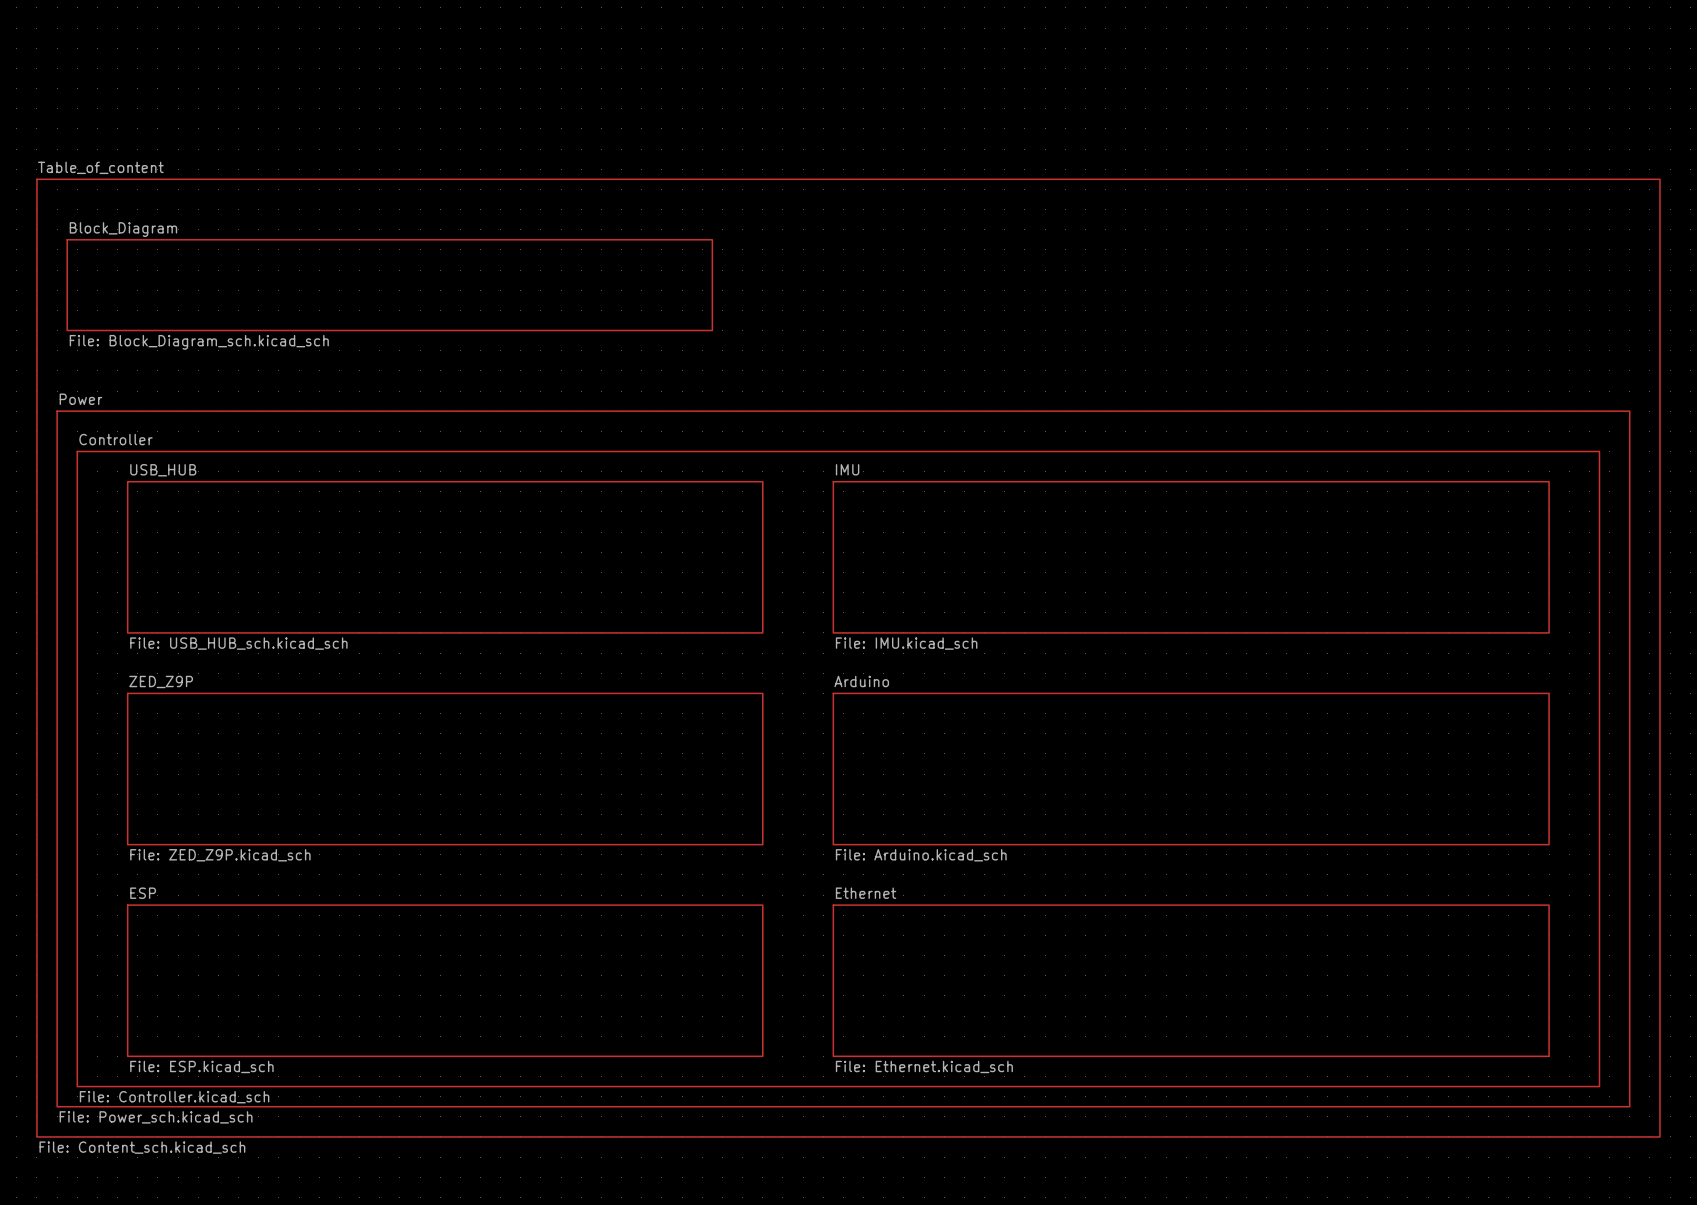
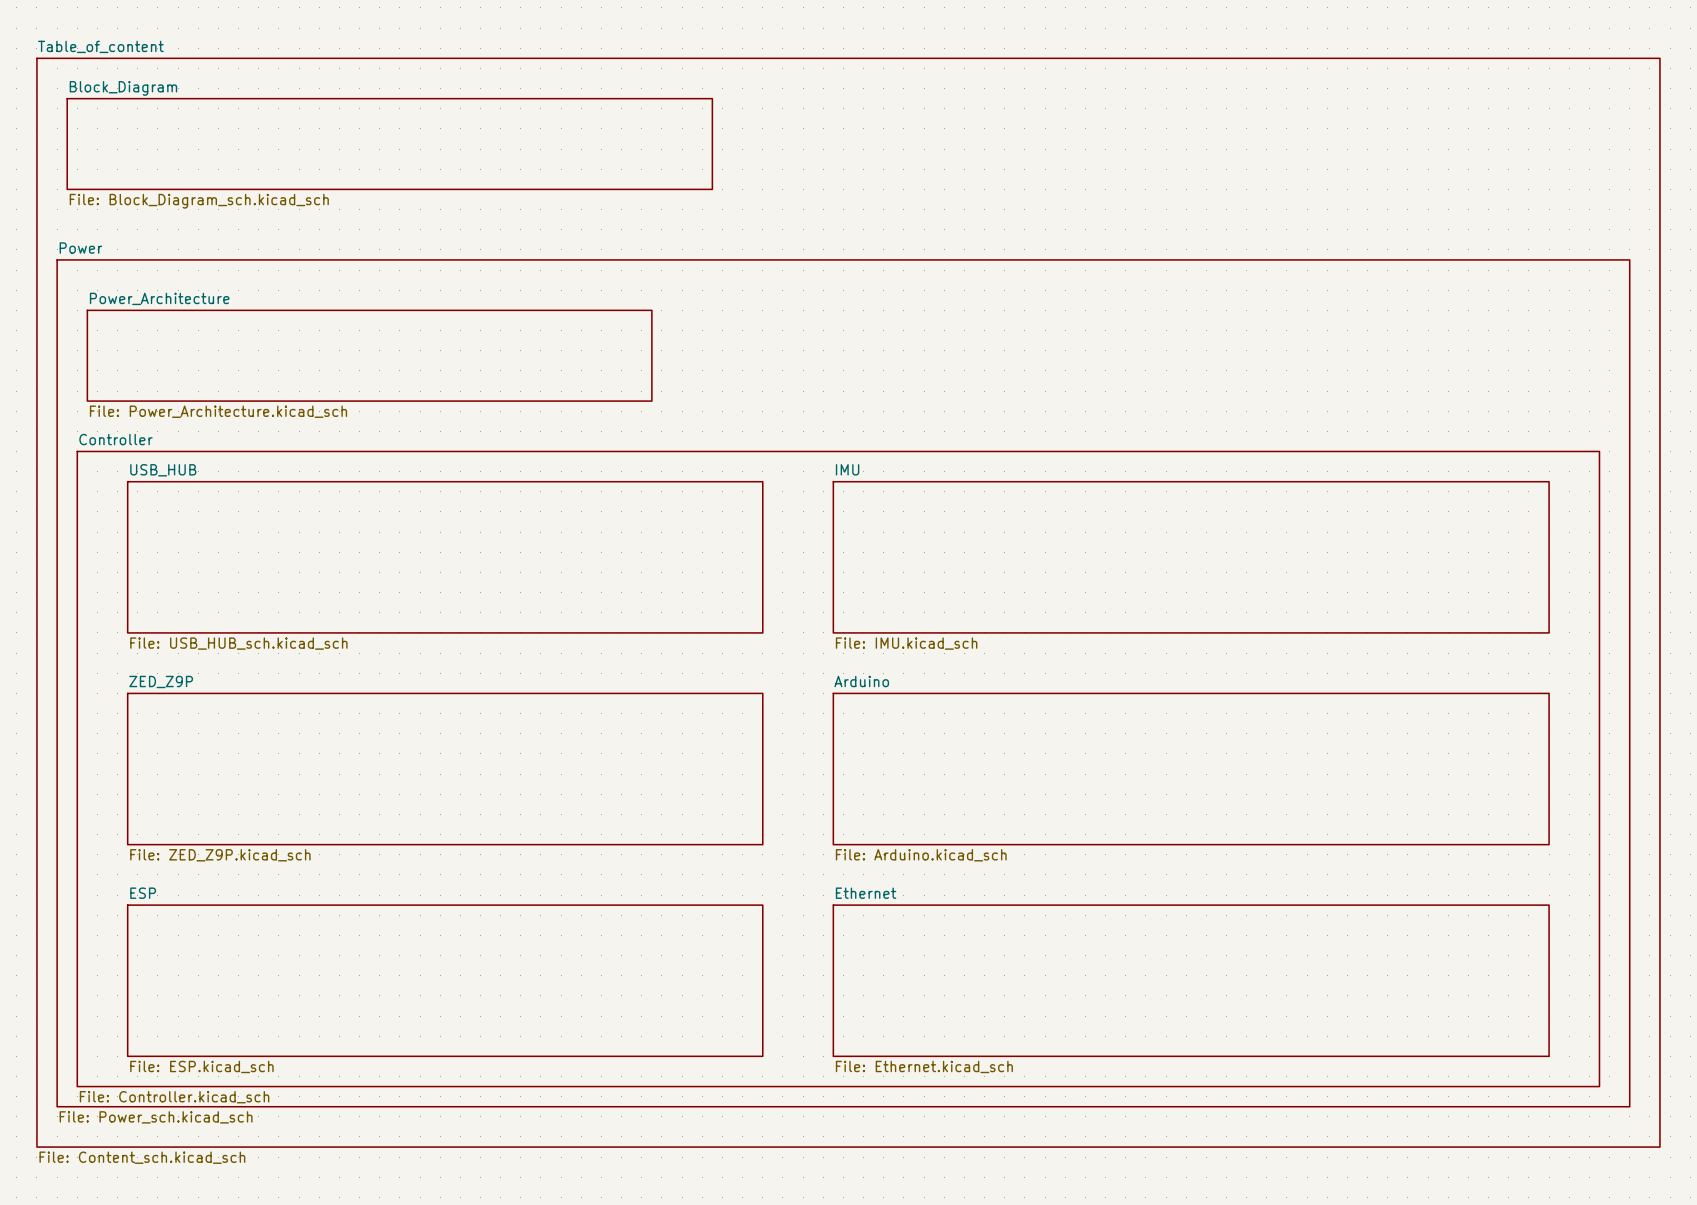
sheet Block_Diagram position: (389, 285) -> (389, 144)
sheet Power_Architecture: none -> File: Power_Architecture.kicad_sch (369, 355)
sheet Table_of_content: none -> File: Content_sch.kicad_sch (848, 602)
sheet Table_of_content: File: Content_sch.kicad_sch (848, 658) -> none
sheet Power: none -> File: Power_sch.kicad_sch (843, 683)
sheet Power: File: Power_sch.kicad_sch (843, 758) -> none

